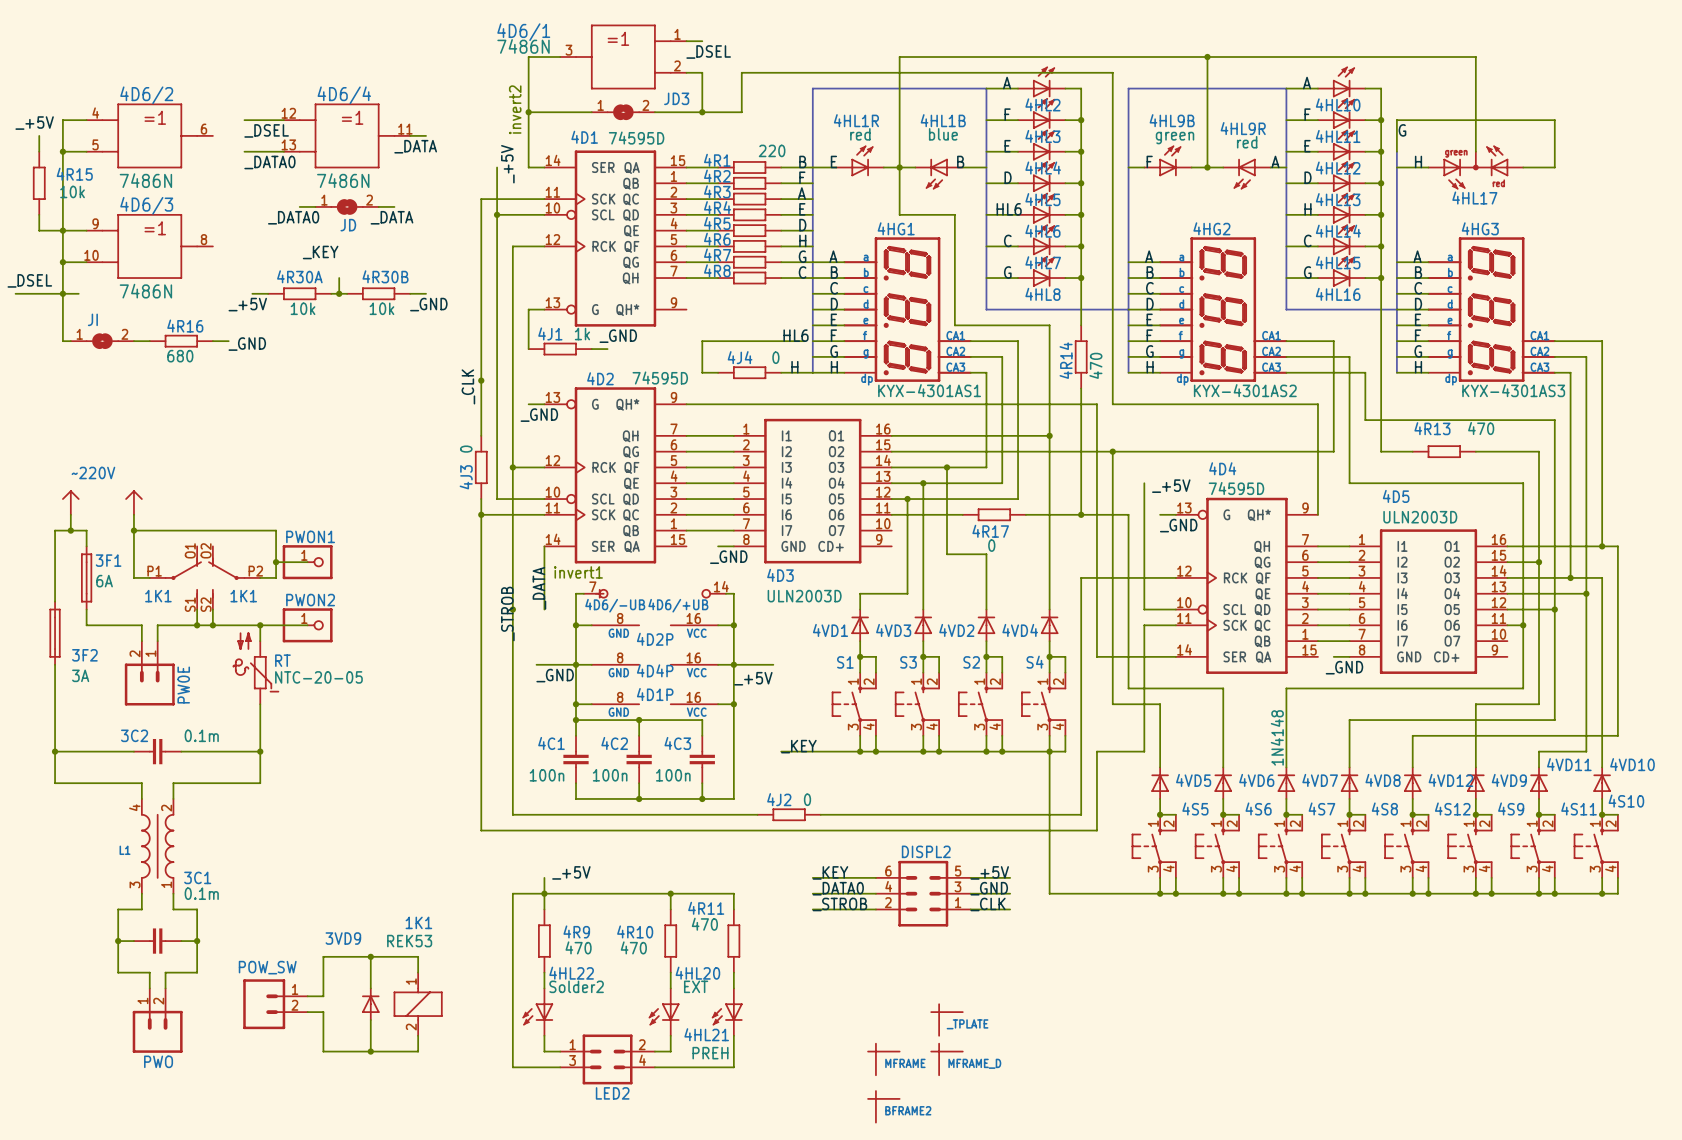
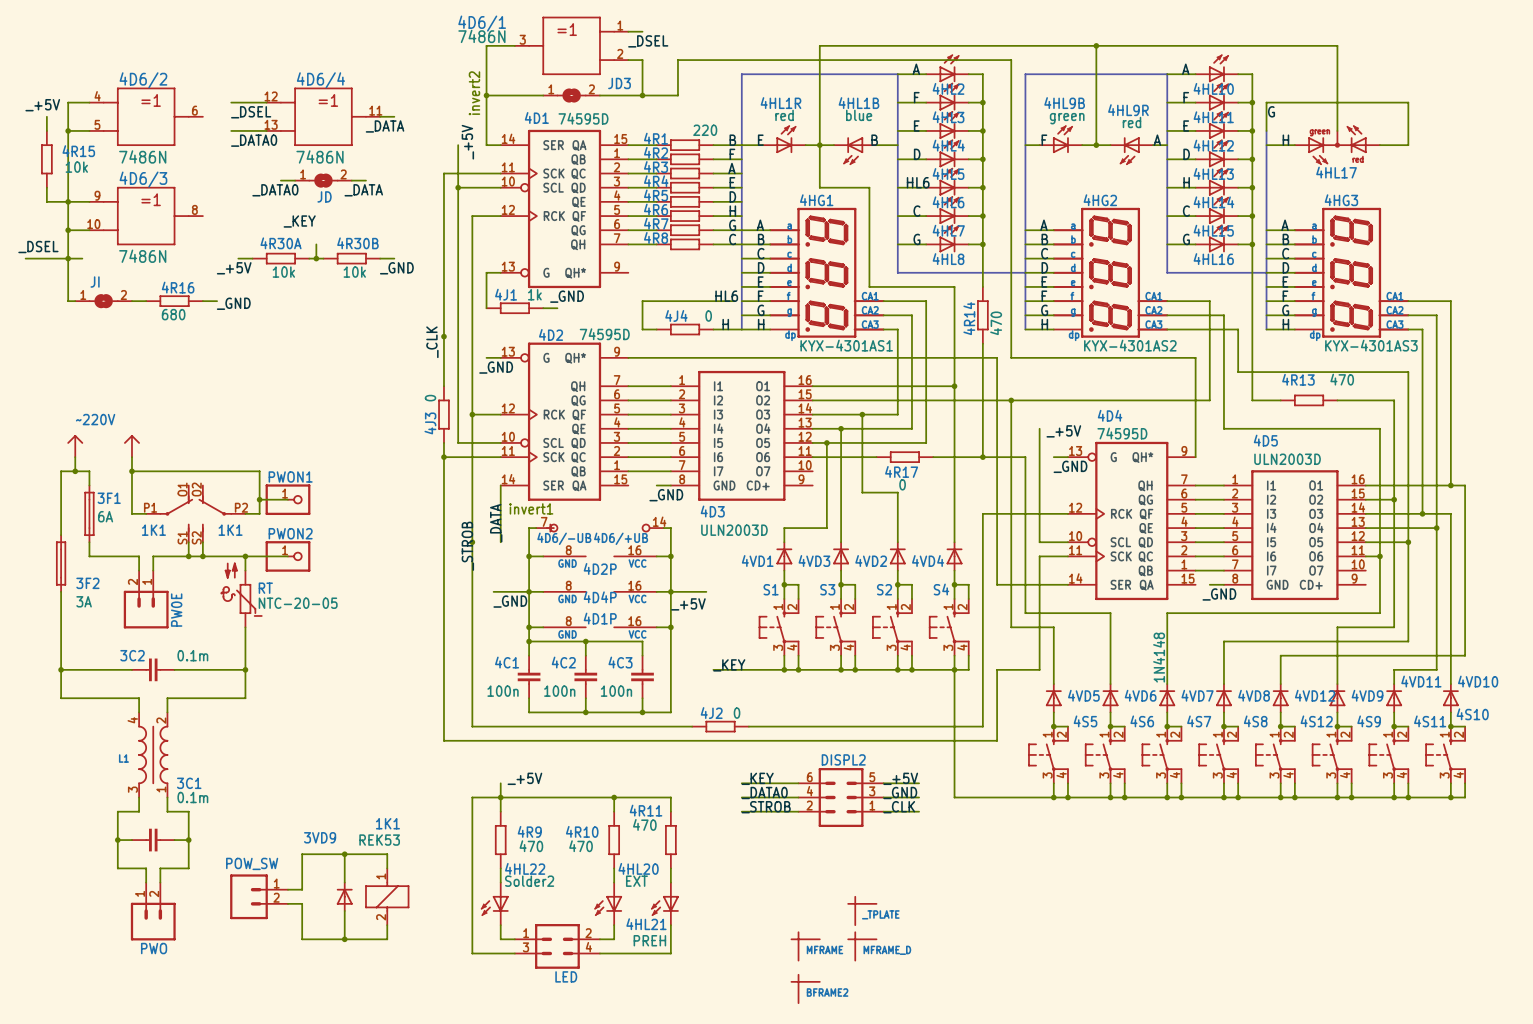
LED2 name: LED2 (612, 1093) -> LED (566, 976)

